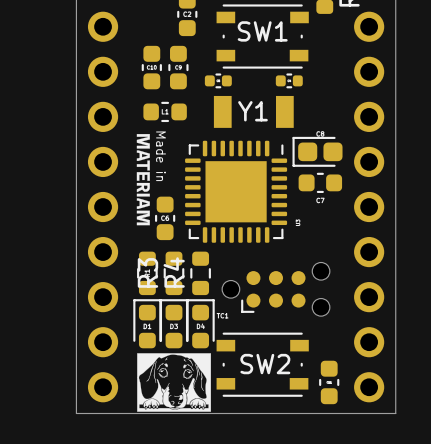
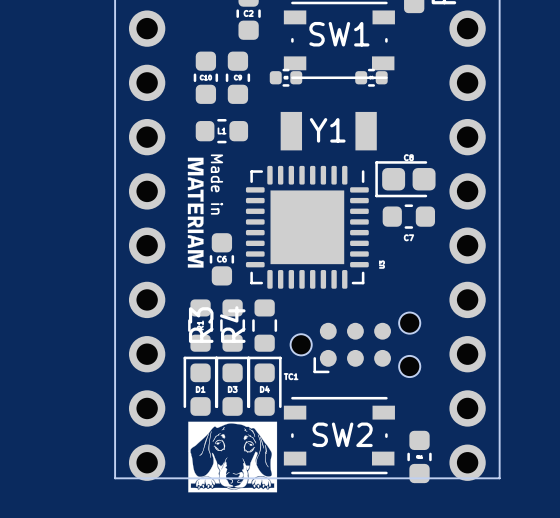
part position: (218, 80) -> (286, 77)
part position: (289, 80) -> (371, 77)
board edge: (76, 400) (76, 413) (395, 413) (395, 400) -> (115, 478) (499, 478)

